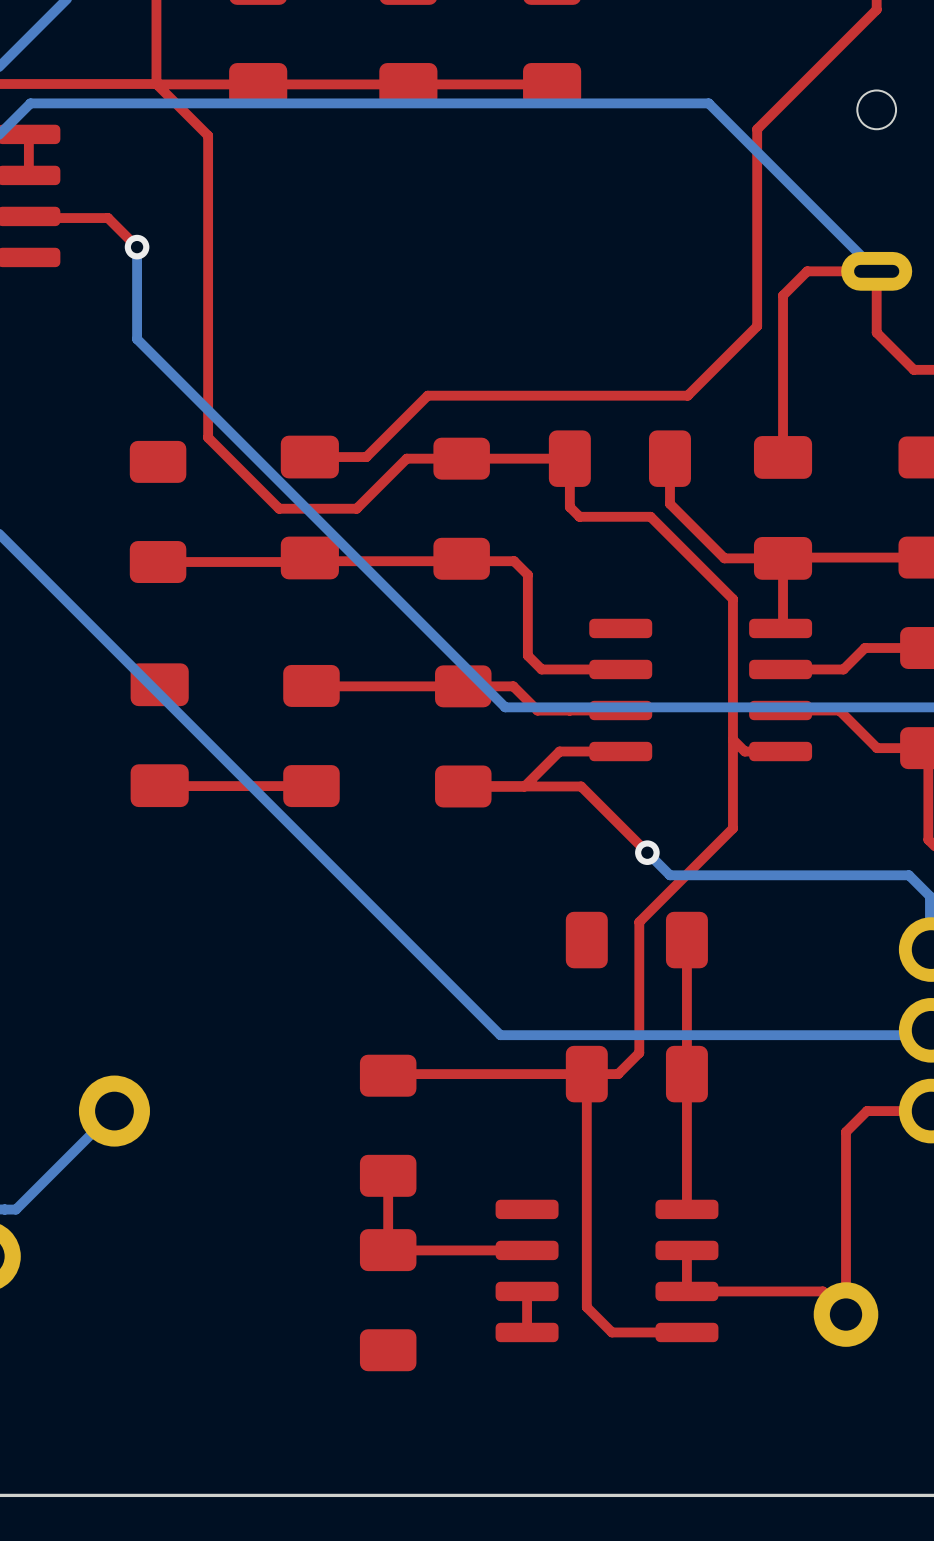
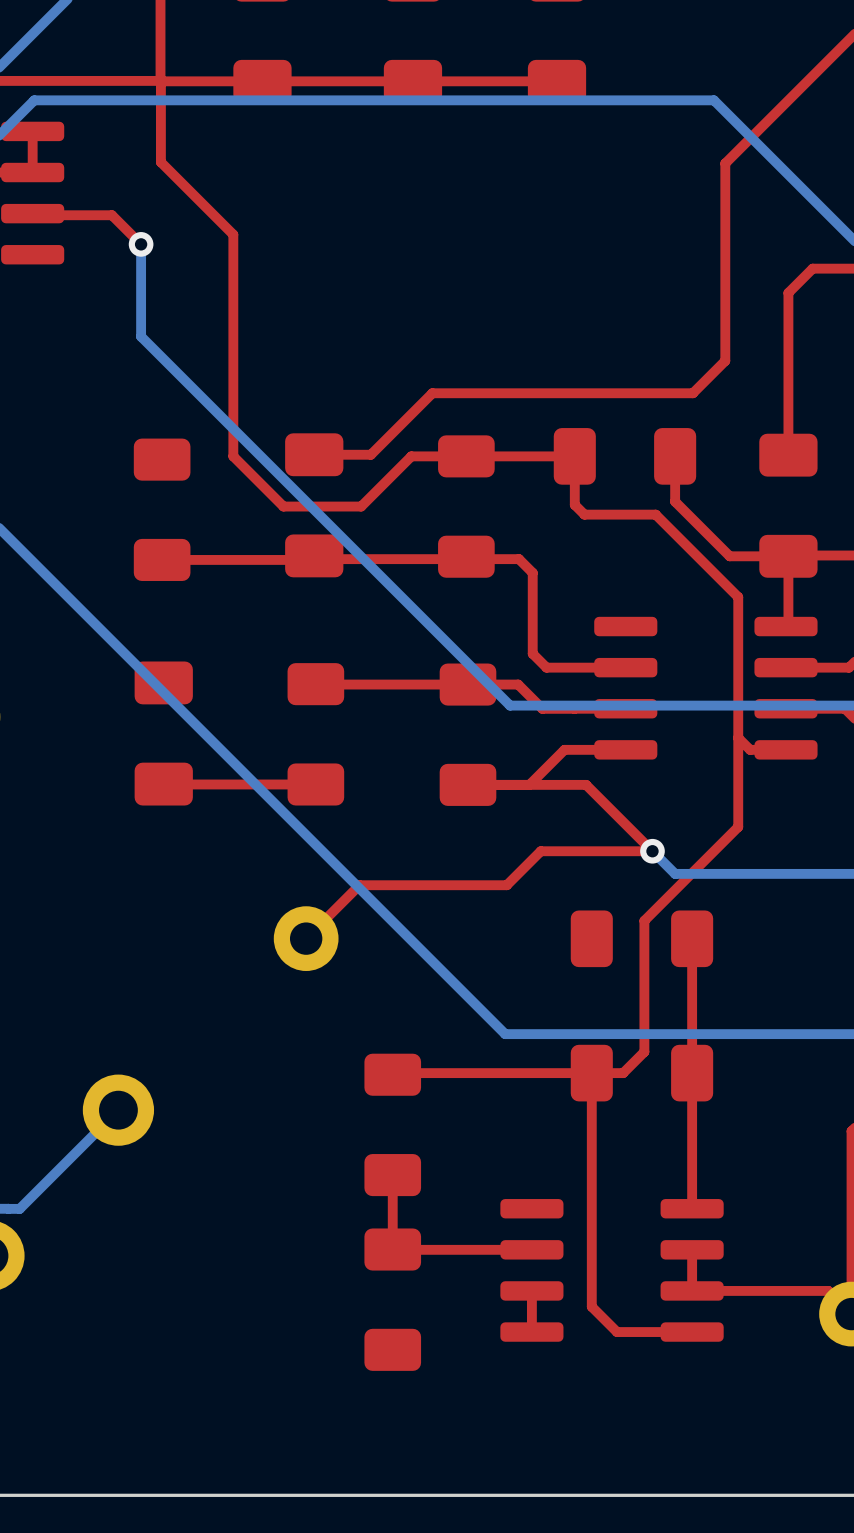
top track: (156, 84) (208, 135) (208, 437) (229, 458) -> (160, 81) (160, 162) (233, 234) (233, 456)
top track: (757, 129) (757, 326) (720, 363) -> (762, 126) (725, 163) (725, 360)
top track: none -> (652, 851) (540, 851) (506, 885) (359, 885) (306, 938)
part: none -> (306, 938)

